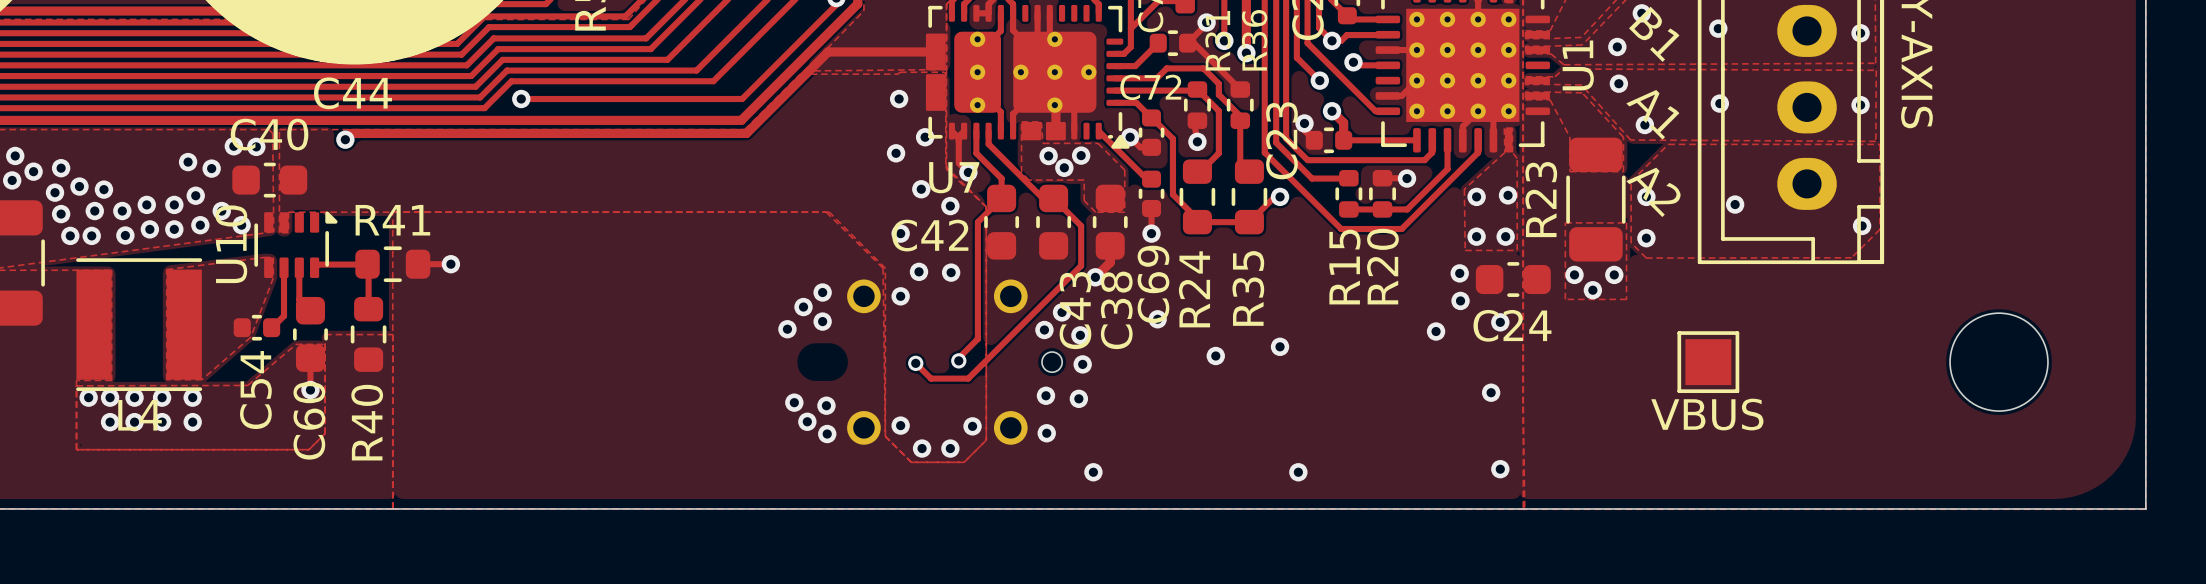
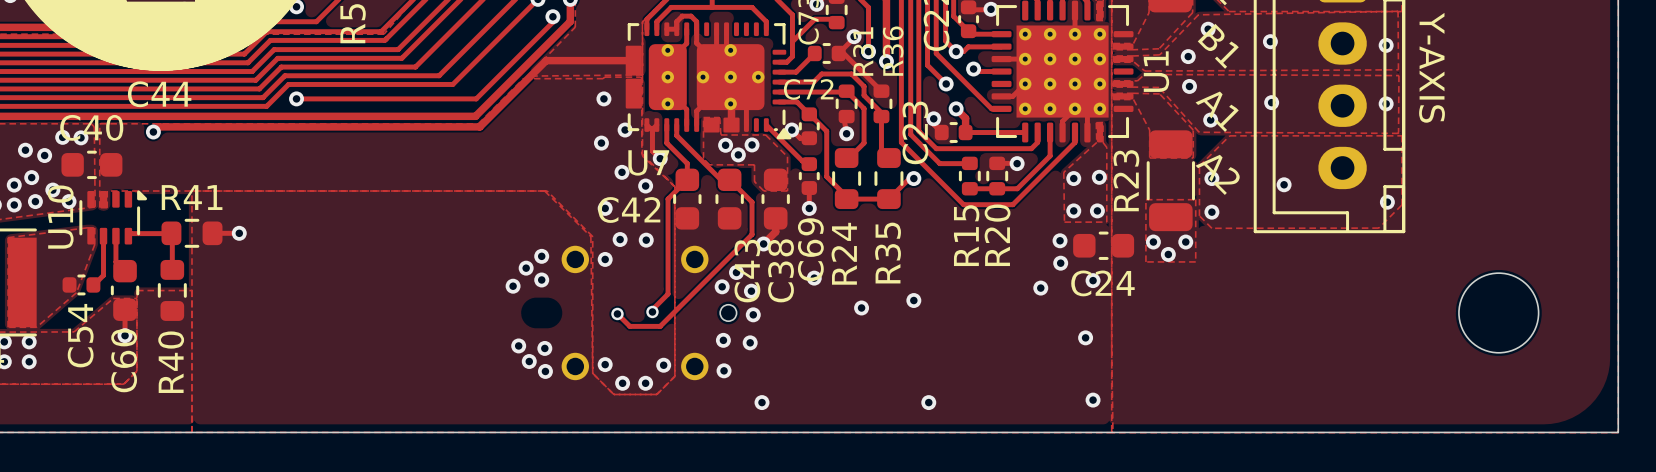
part: VBUS (1708, 362) -> none

